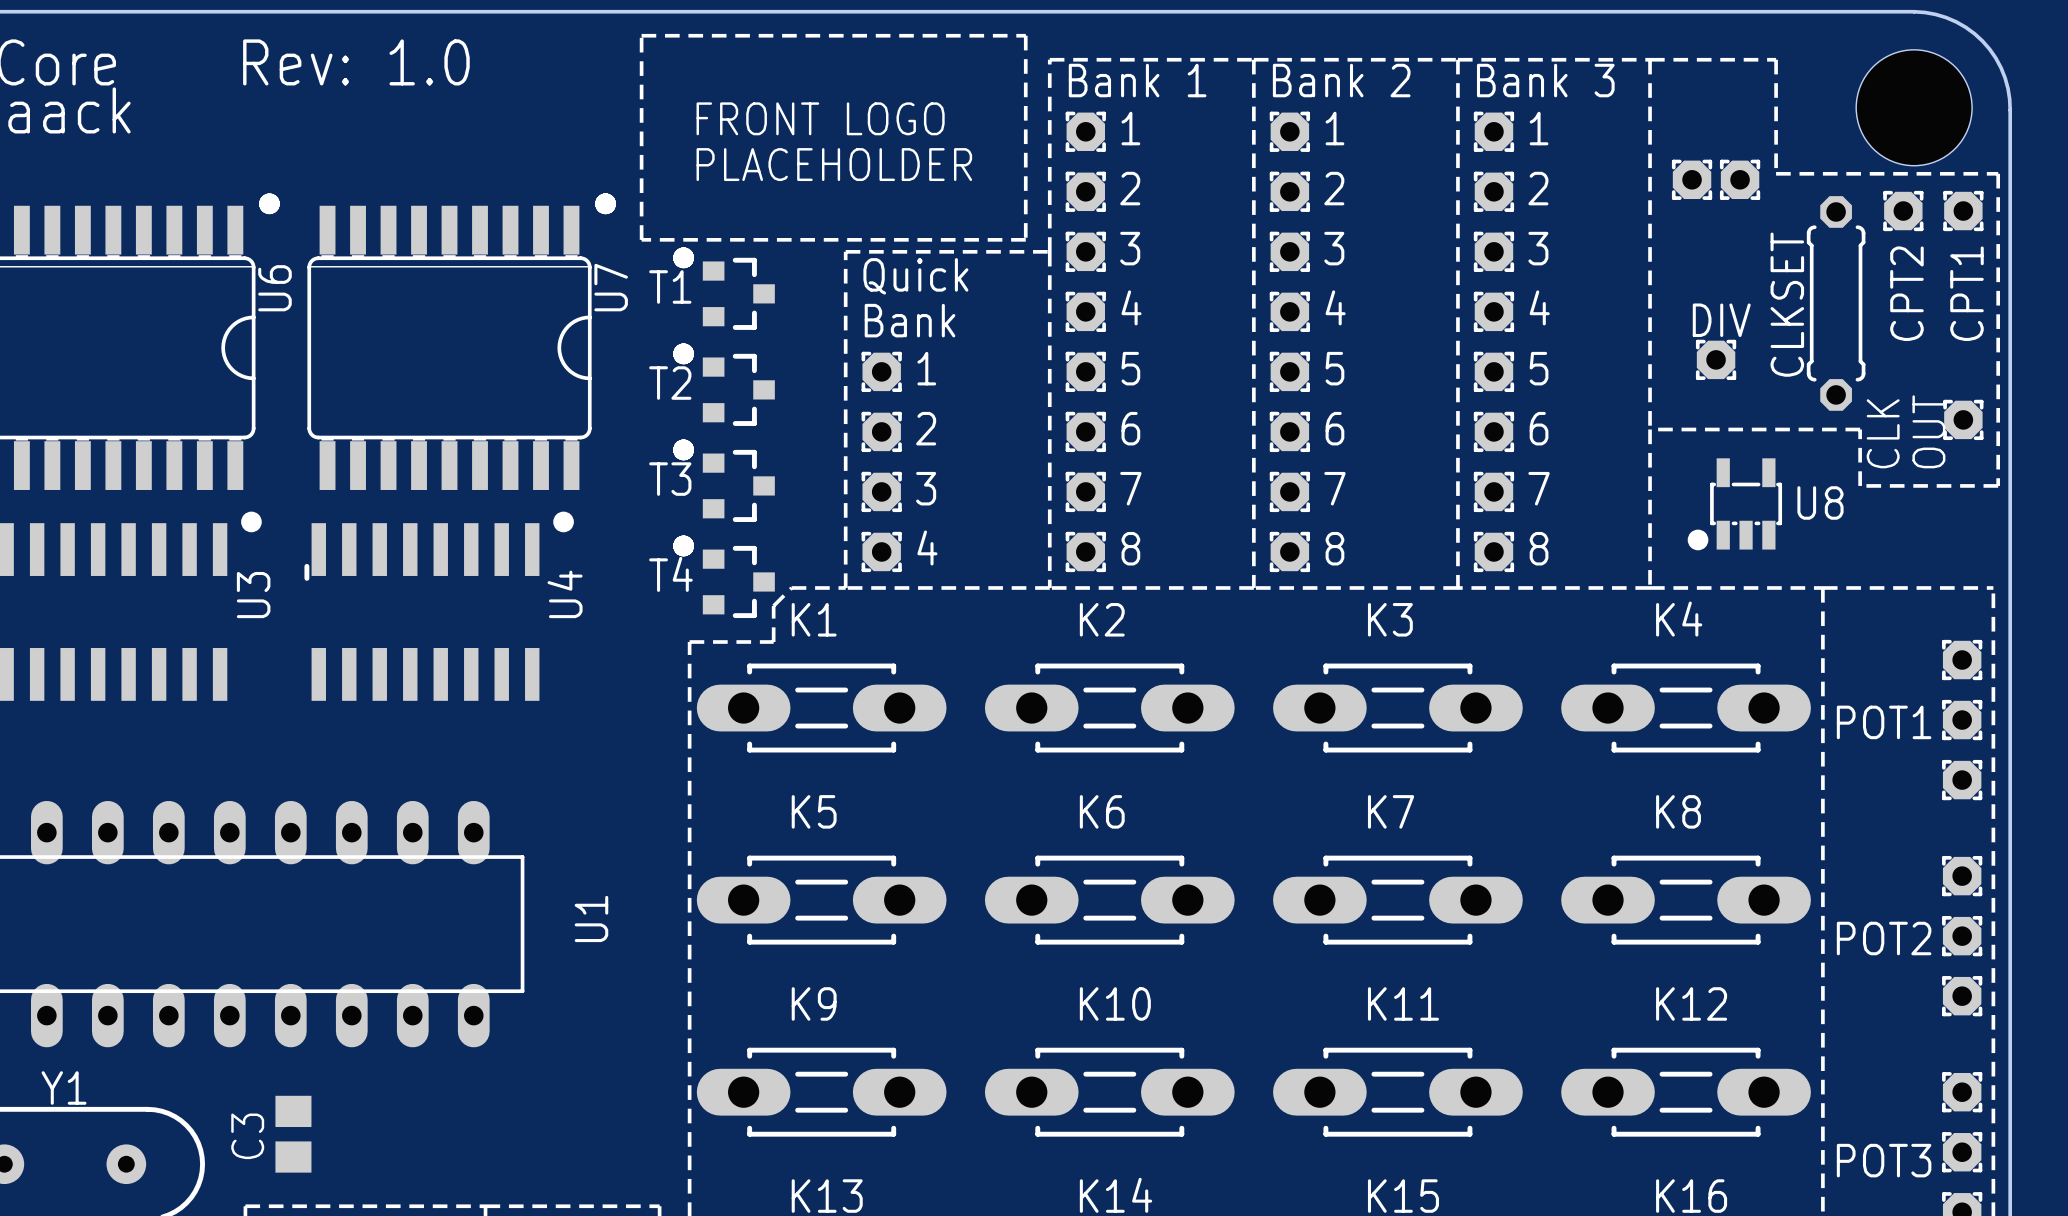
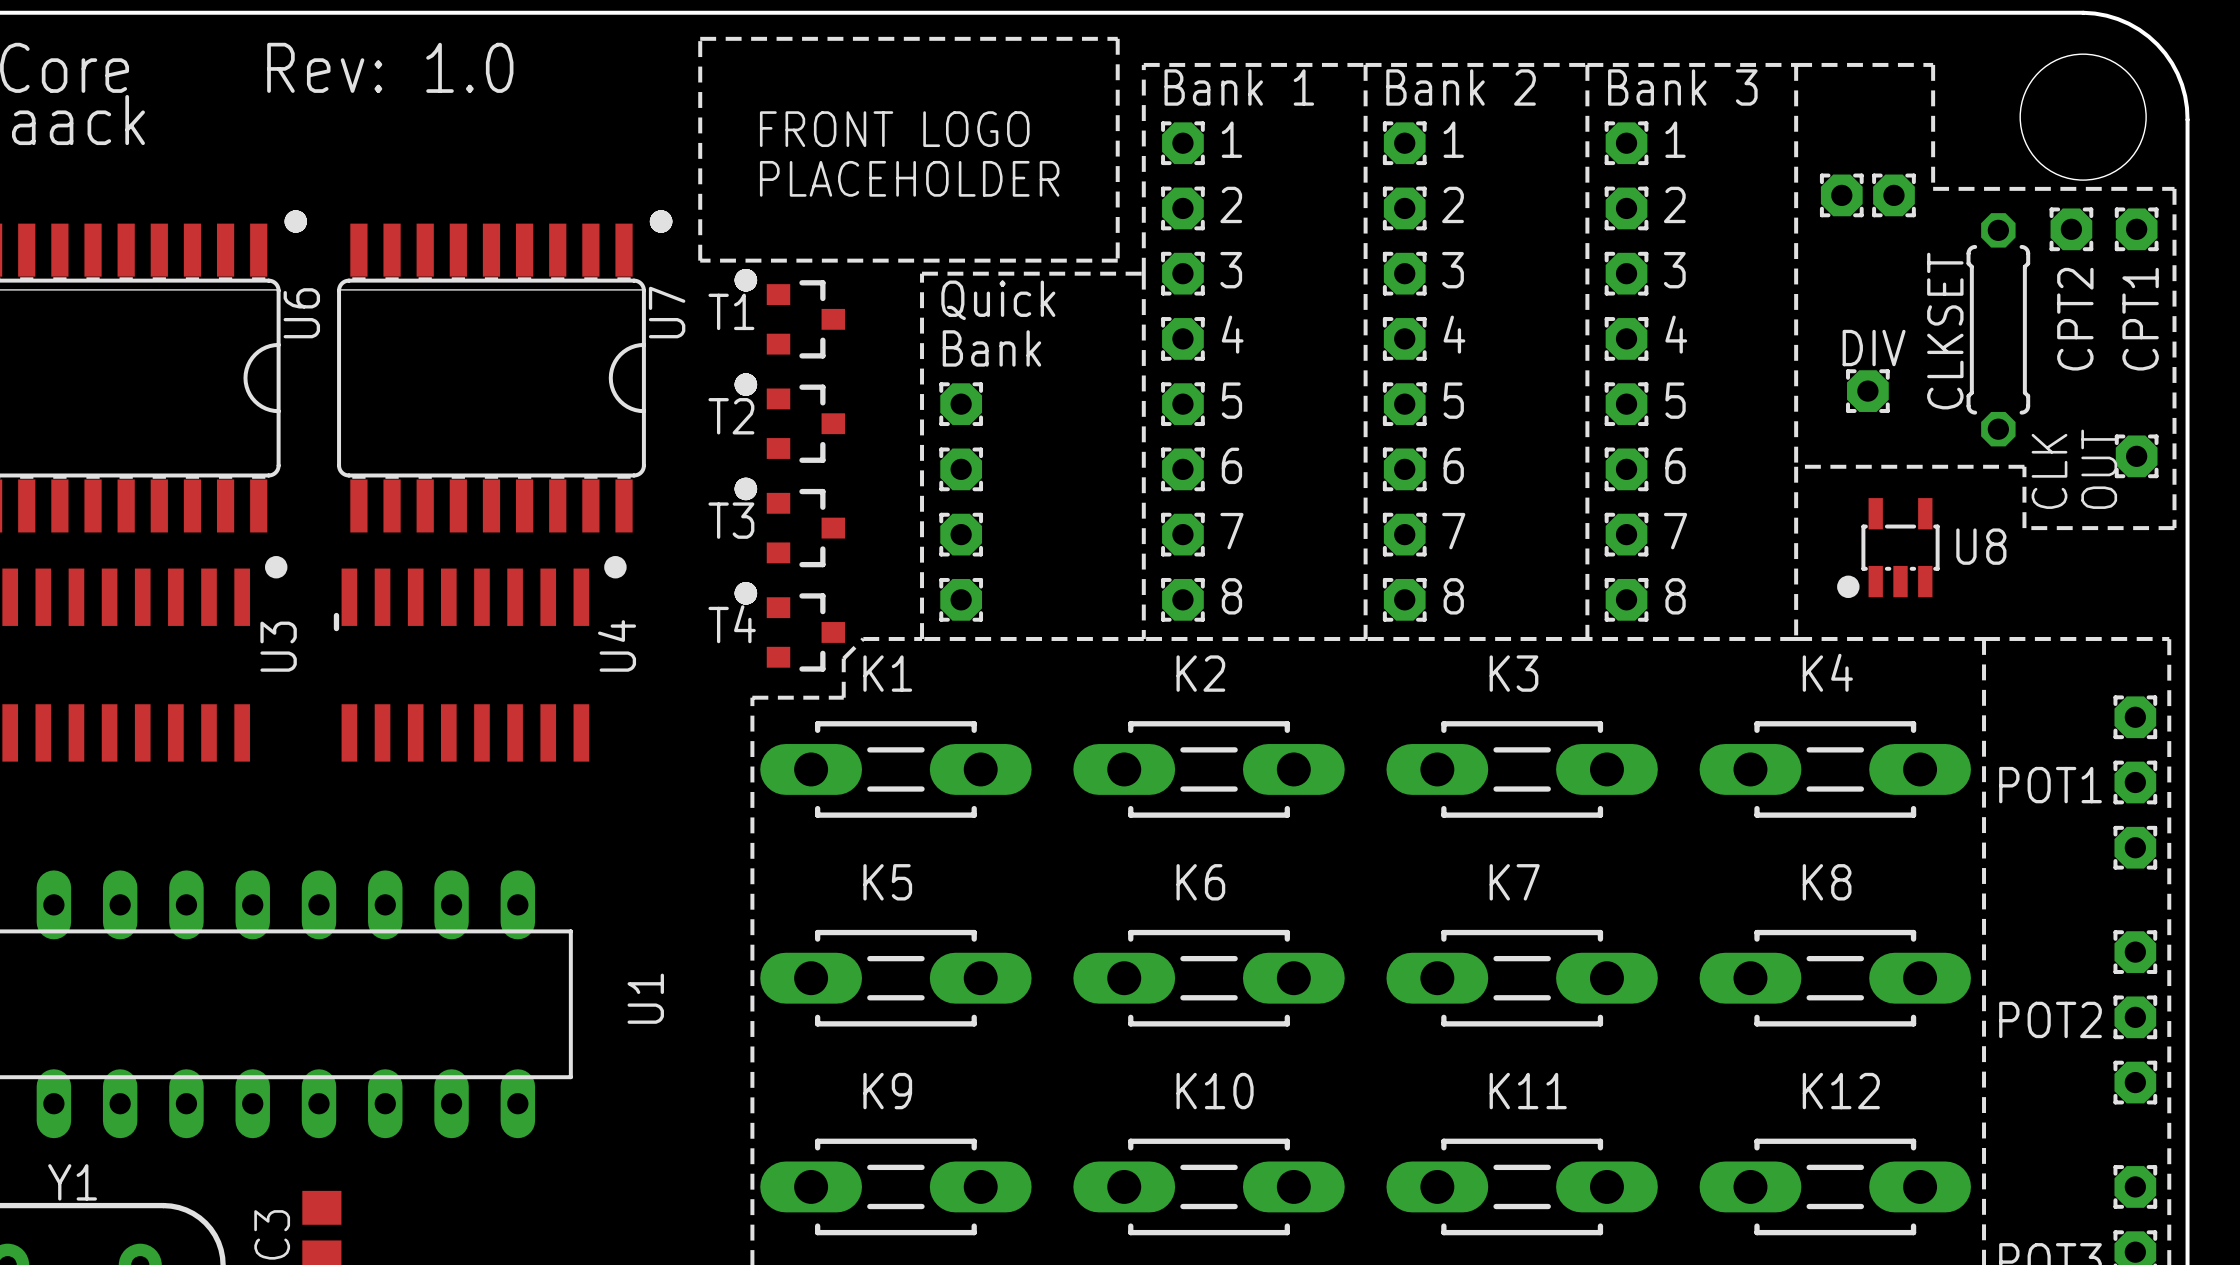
text: 1 (926, 368) -> none
text: 2 (926, 428) -> none
text: 3 (926, 488) -> none
text: 4 (927, 548) -> none

